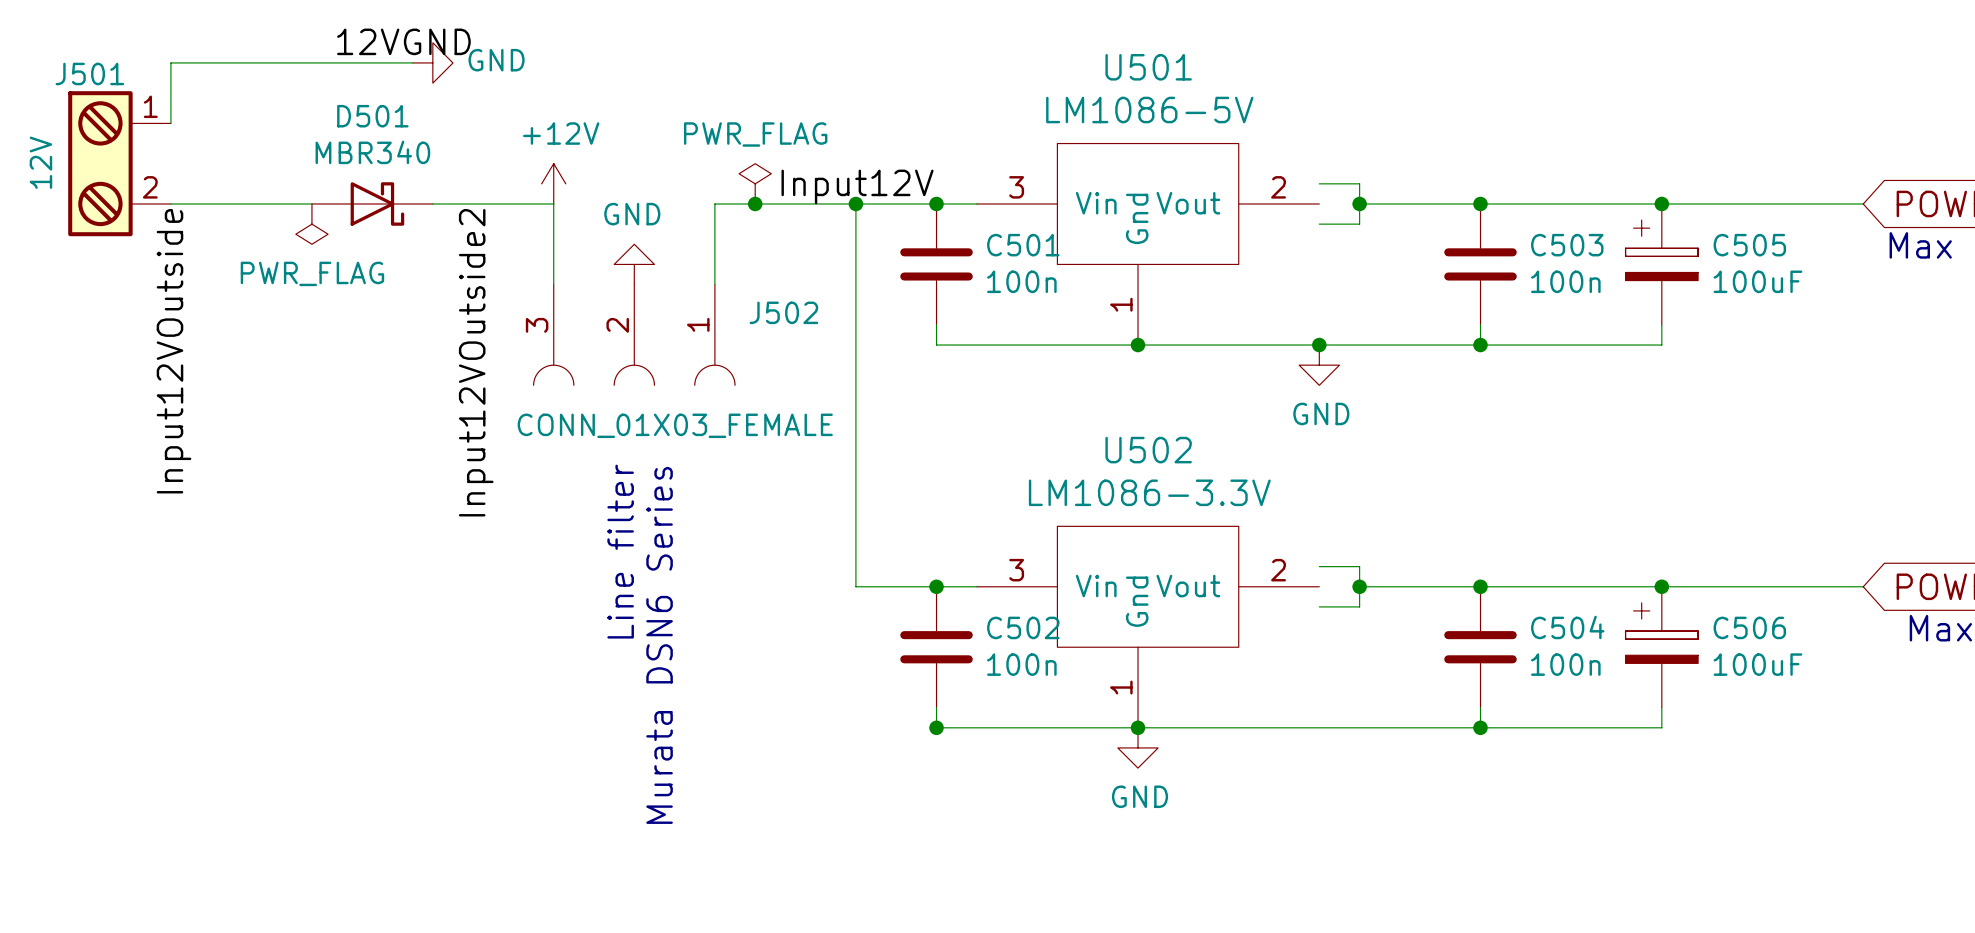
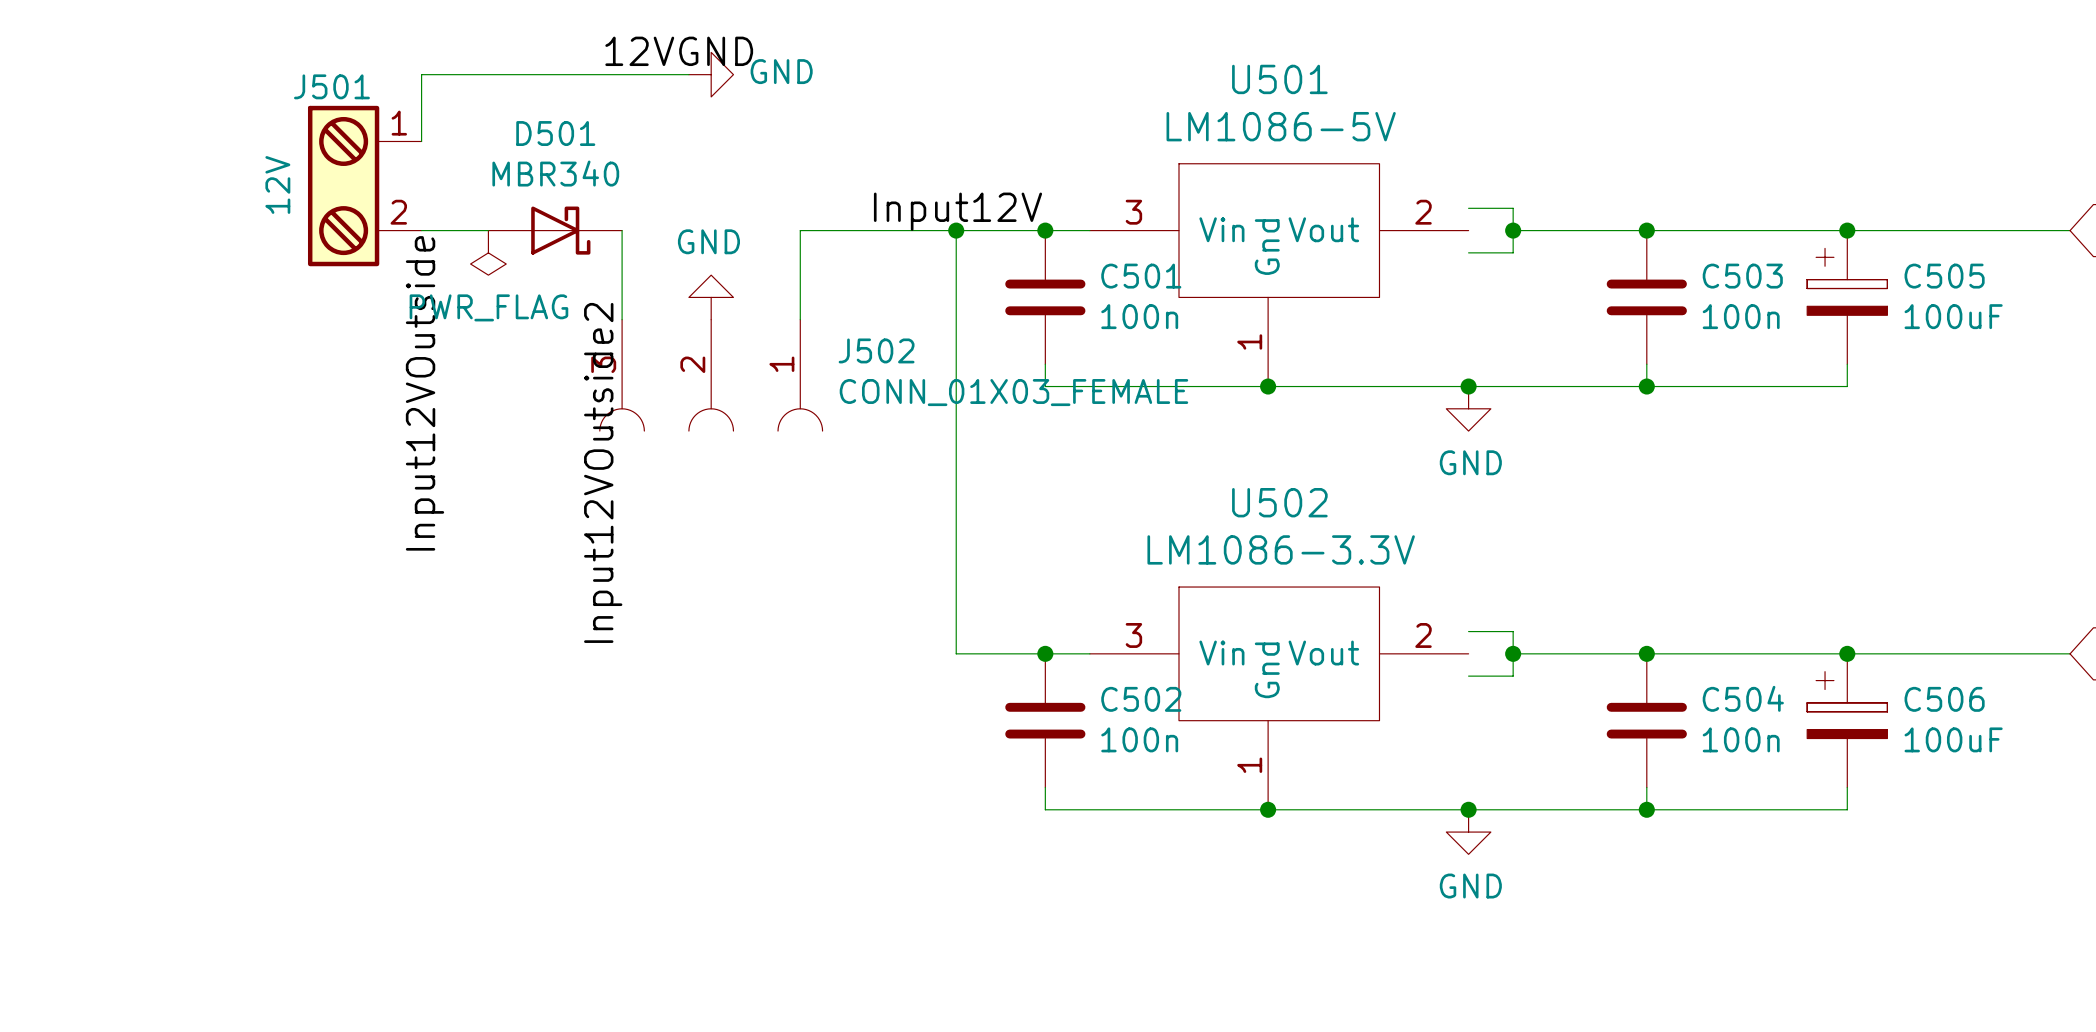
label position: 12VGND (403, 41) -> 12VGND (679, 51)
wire: (372, 62) (170, 62) (170, 123) -> (421, 74) (421, 141)
wire: none -> (466, 74) (688, 74)
power symbol position: GND (432, 62) -> GND (711, 74)
J501 position: (119, 163) -> (364, 186)
power symbol: +12V (553, 183) -> none
power symbol: PWR_FLAG (755, 183) -> none
wire: (170, 203) (311, 203) -> none
D501 position: (372, 203) -> (555, 230)
junction: (755, 203) -> none
power symbol position: PWR_FLAG (311, 224) -> PWR_FLAG (488, 252)
label position: Input12VOutside (174, 351) -> Input12VOutside (425, 393)
label position: Input12VOutside2 (476, 362) -> Input12VOutside2 (603, 472)
J502 value position: CONN_01X03_FEMALE (675, 425) -> CONN_01X03_FEMALE (1013, 392)
text: Line filter (620, 551) -> none
text: Murata DSN6 Series (659, 645) -> none
junction: (936, 727) -> none
junction: none -> (1468, 809)
power symbol position: GND (1137, 747) -> GND (1468, 832)

